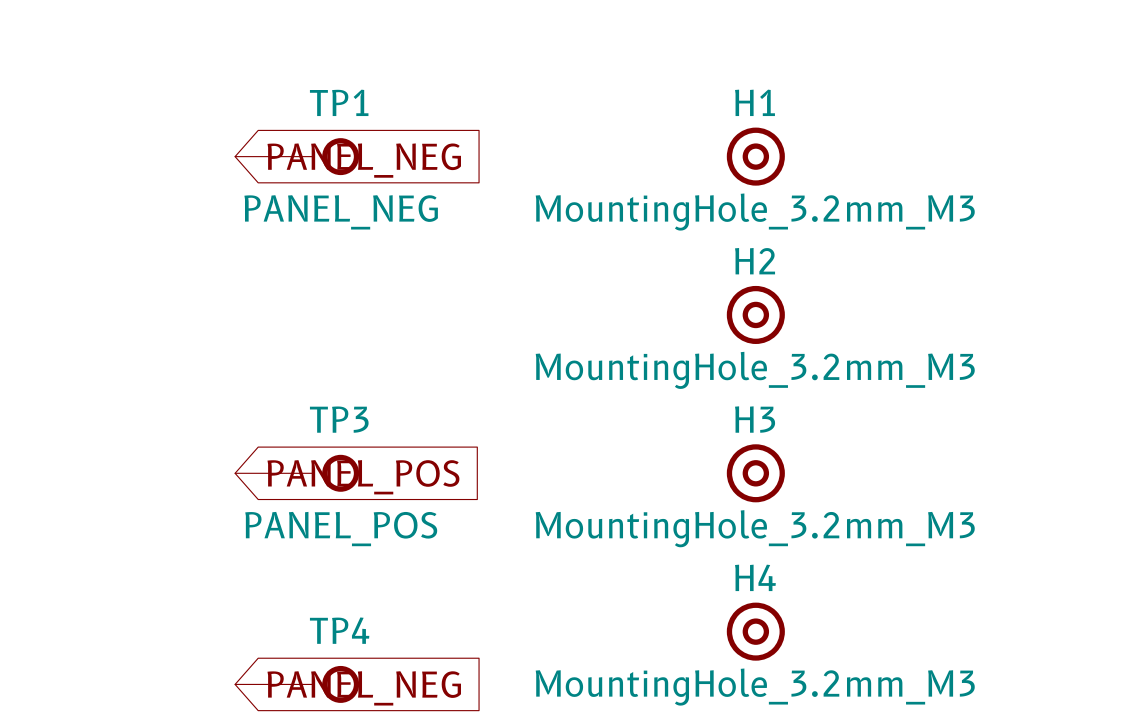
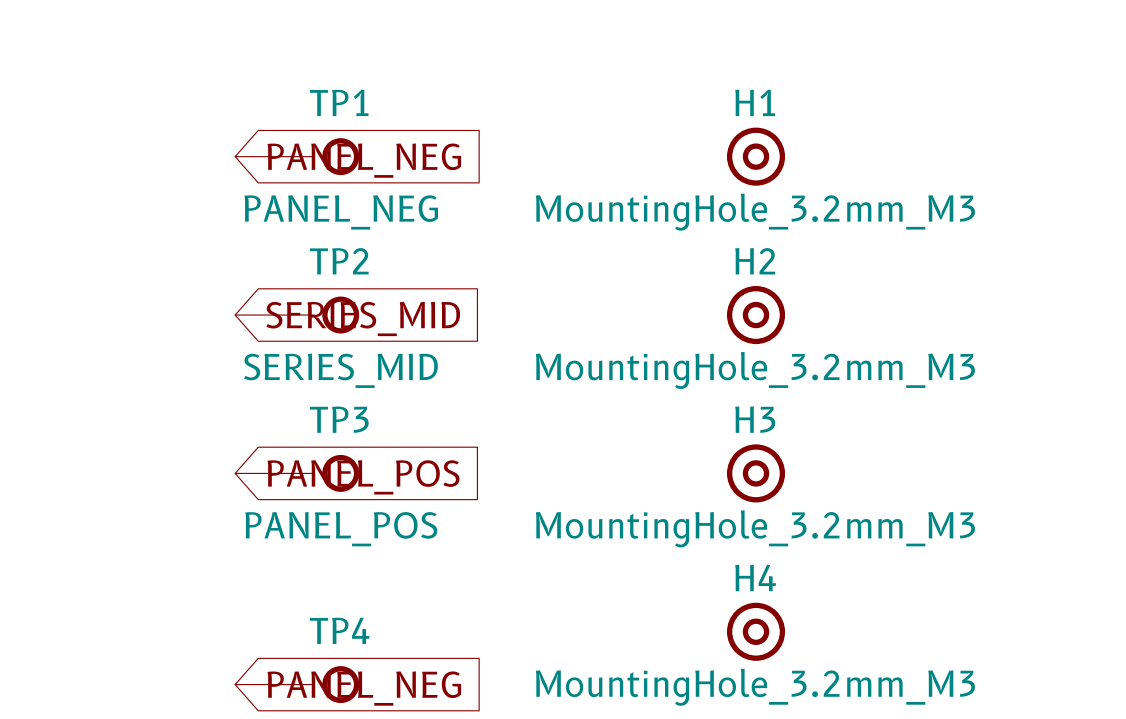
TP2: none -> SERIES_MID (297, 315)
global label: none -> SERIES_MID (363, 318)

